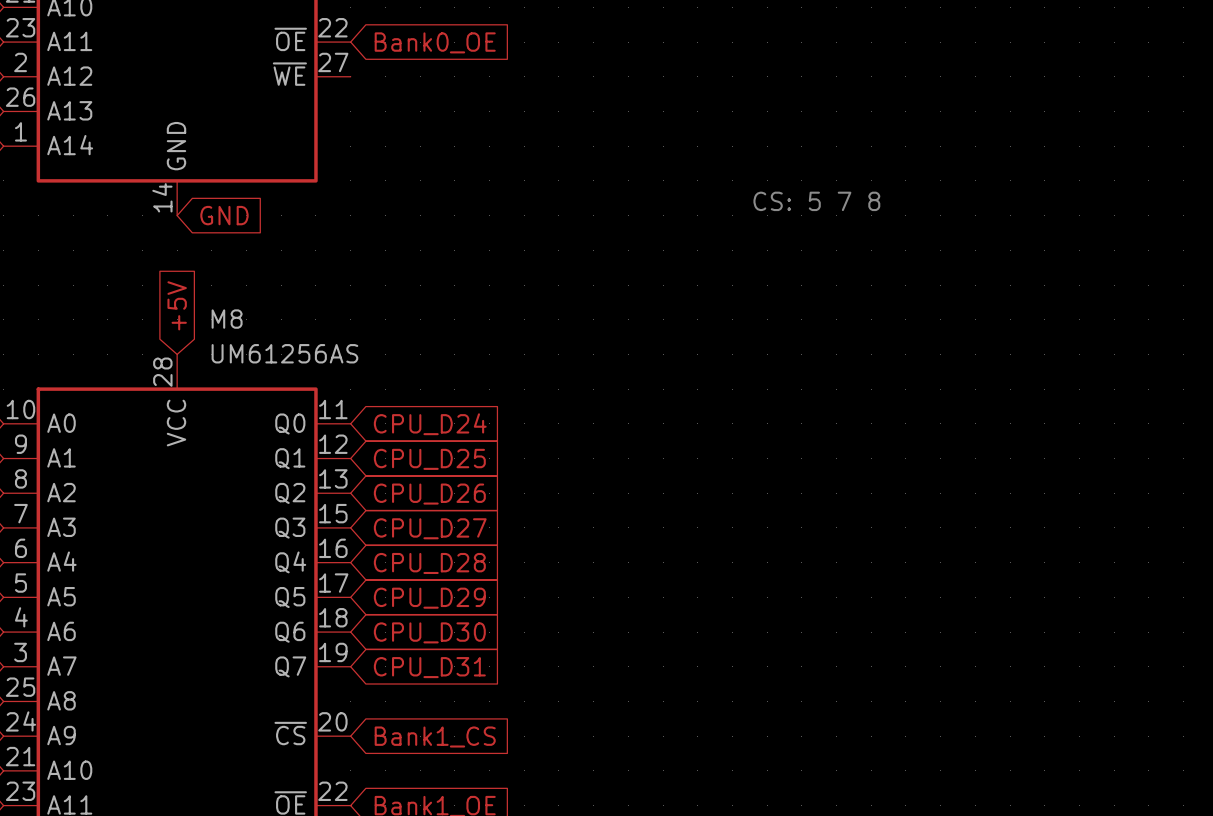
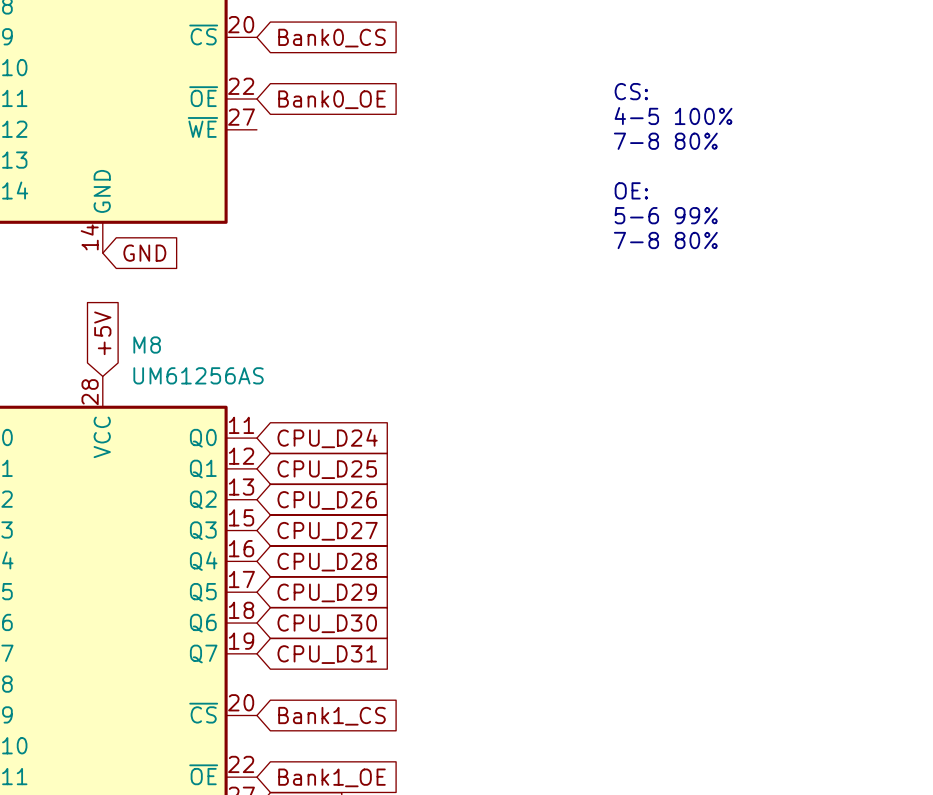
text: none -> CS: (631, 91)
text: none -> 4-5 100% (673, 116)
text: none -> 7-8 80% (665, 141)
text: none -> OE: (631, 190)
text: none -> 5-6 99% (666, 215)
text: CS: 5 7 8 (816, 201) -> 7-8 80% (665, 240)

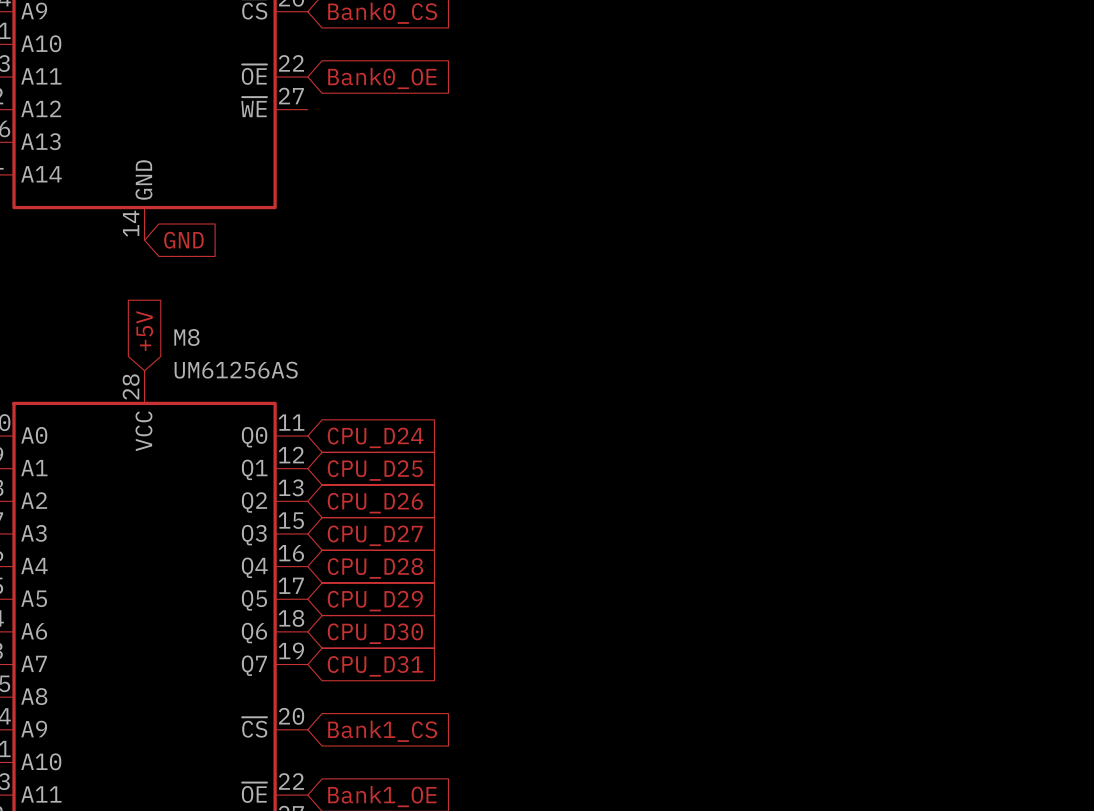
text: CS: (631, 91) -> none
text: 4-5 100% (673, 116) -> none
text: 7-8 80% (665, 141) -> none
text: OE: (631, 190) -> none
text: 5-6 99% (666, 215) -> none
text: 7-8 80% (665, 240) -> none

